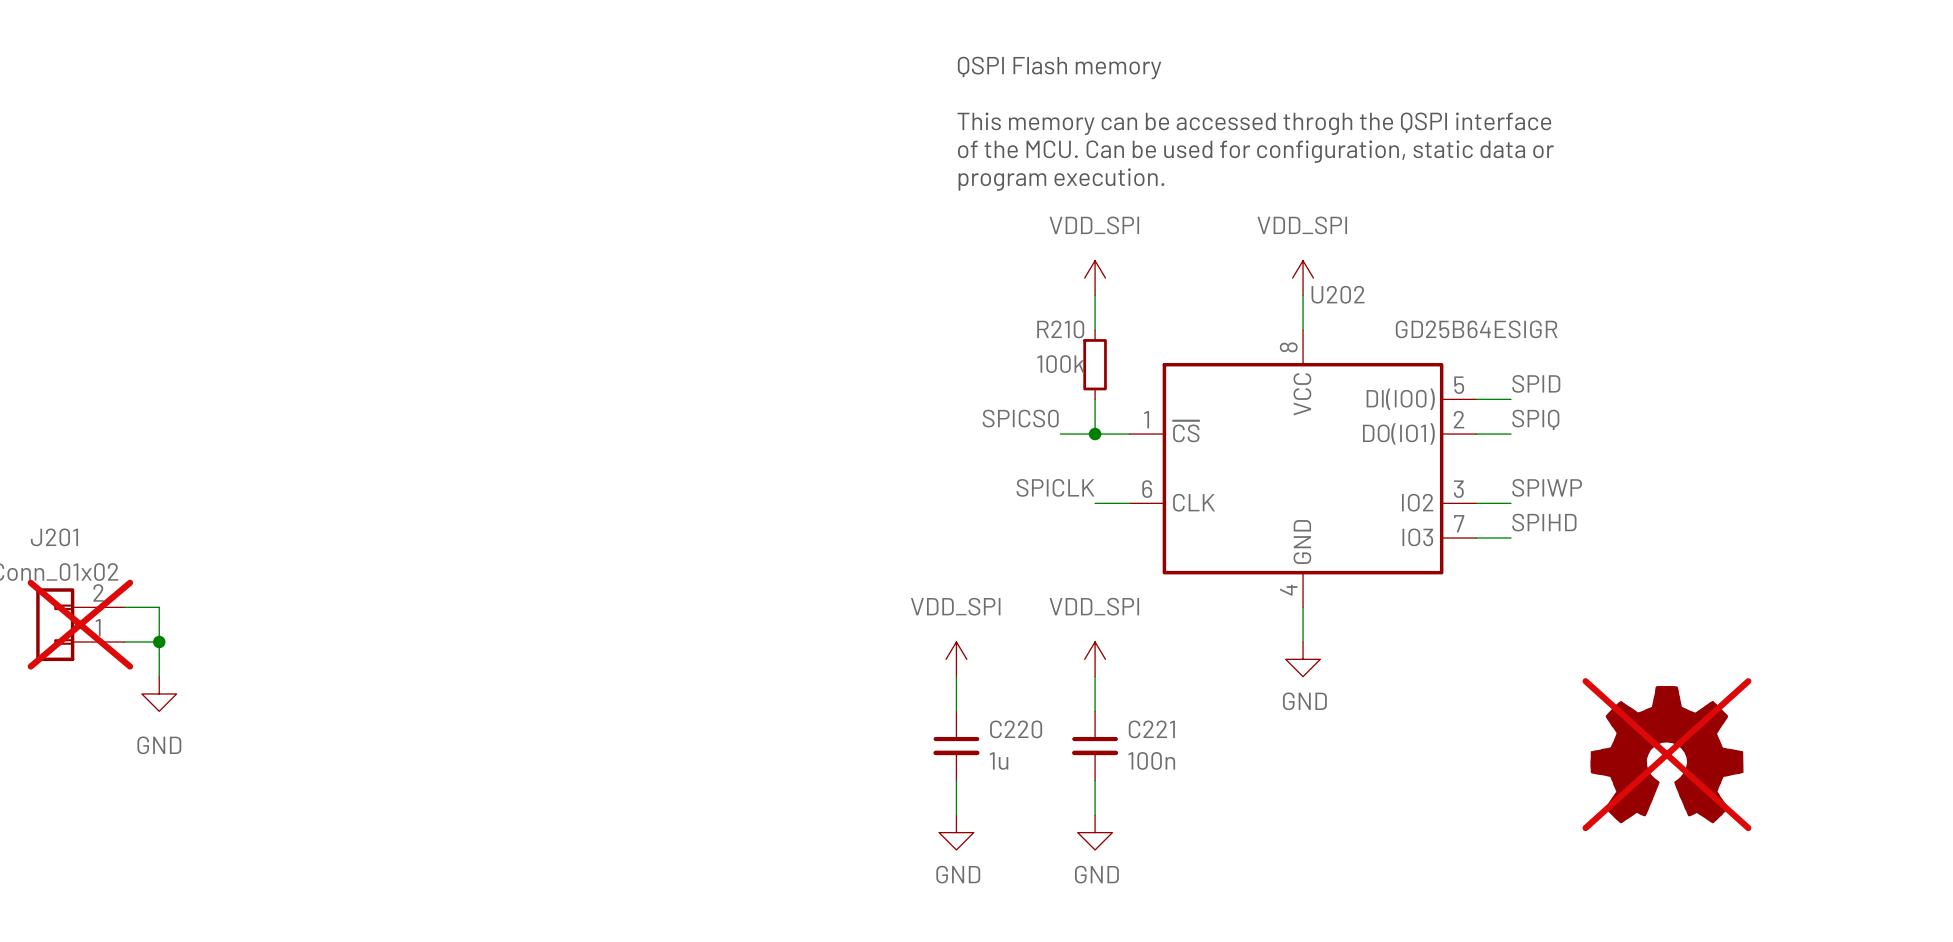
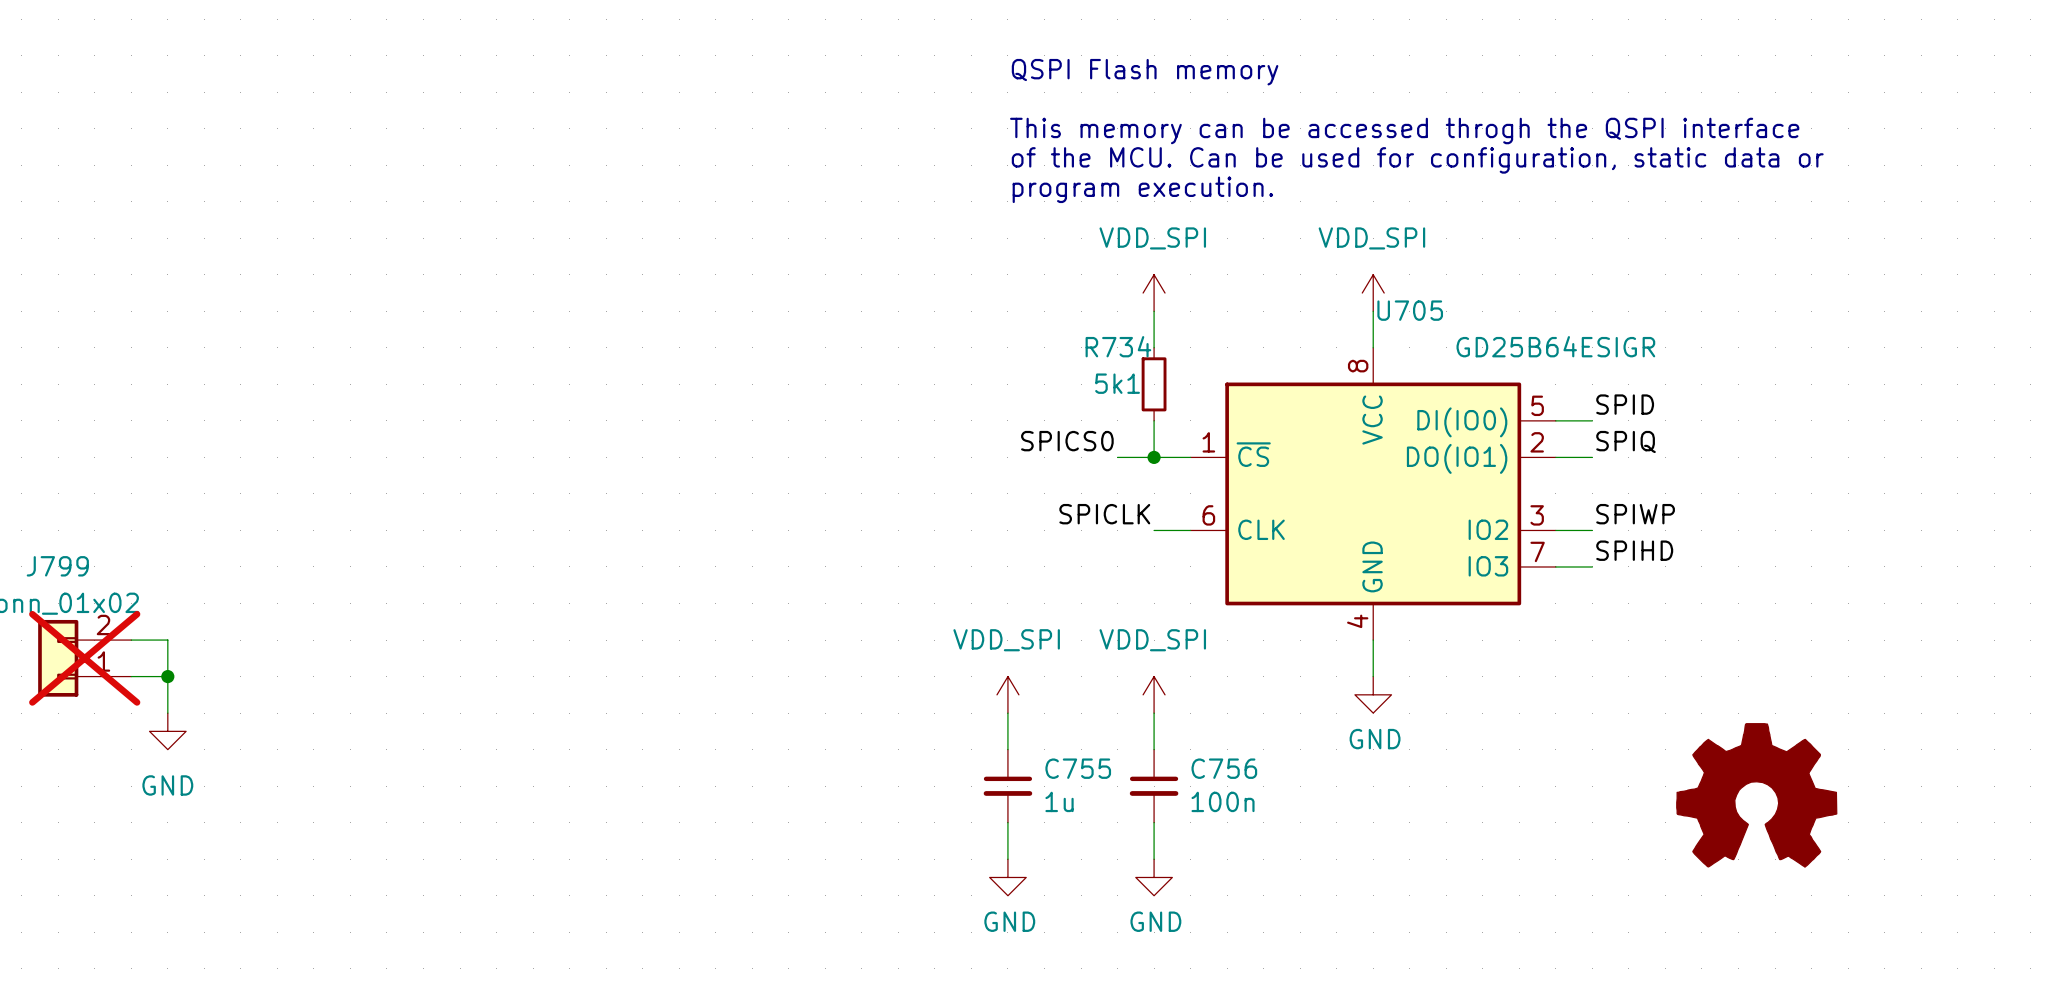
U202 name: U202 (1338, 294) -> U705 (1410, 310)
R210 name: R210 (1060, 329) -> R734 (1118, 346)
R210 value: 100k (1060, 364) -> 5k1 (1117, 383)
J201 name: J201 (54, 537) -> J799 (57, 566)
C220 name: C220 (1016, 729) -> C755 (1078, 768)
C221 name: C221 (1151, 729) -> C756 (1224, 768)
part do-not-place cross: (1666, 754) -> none

